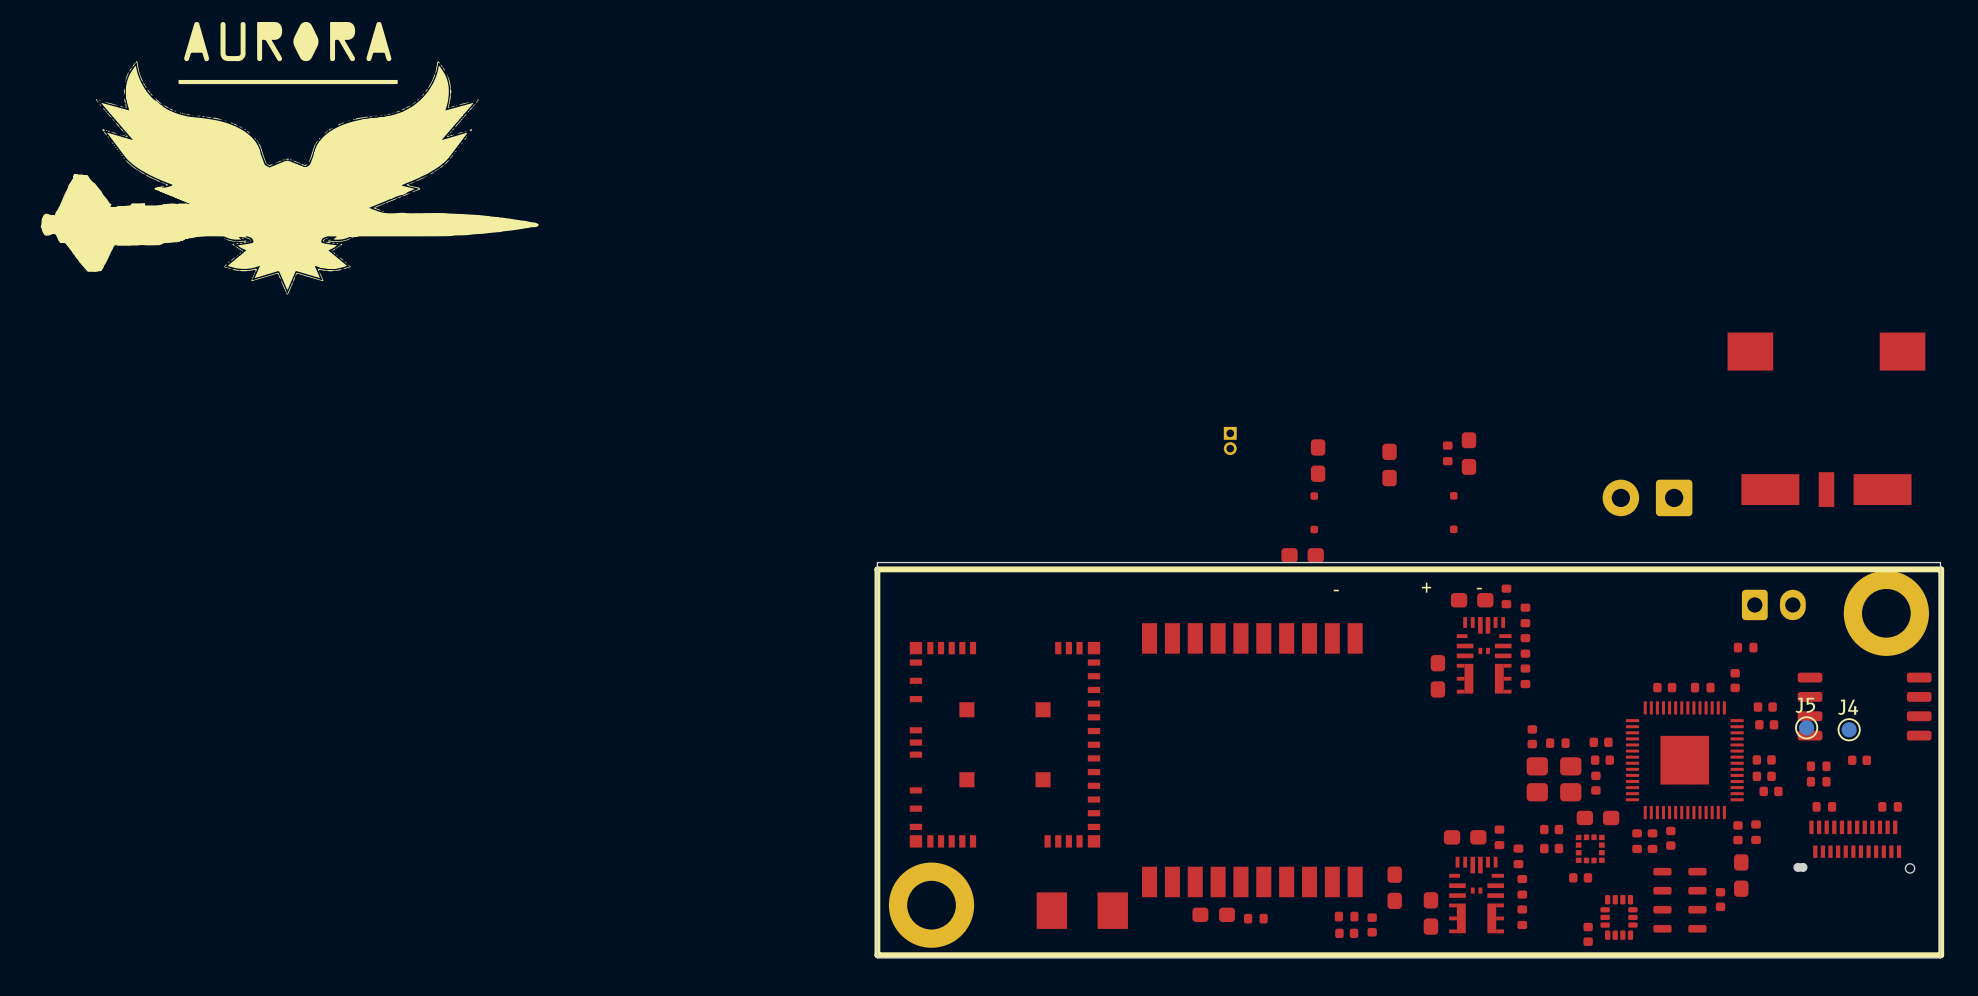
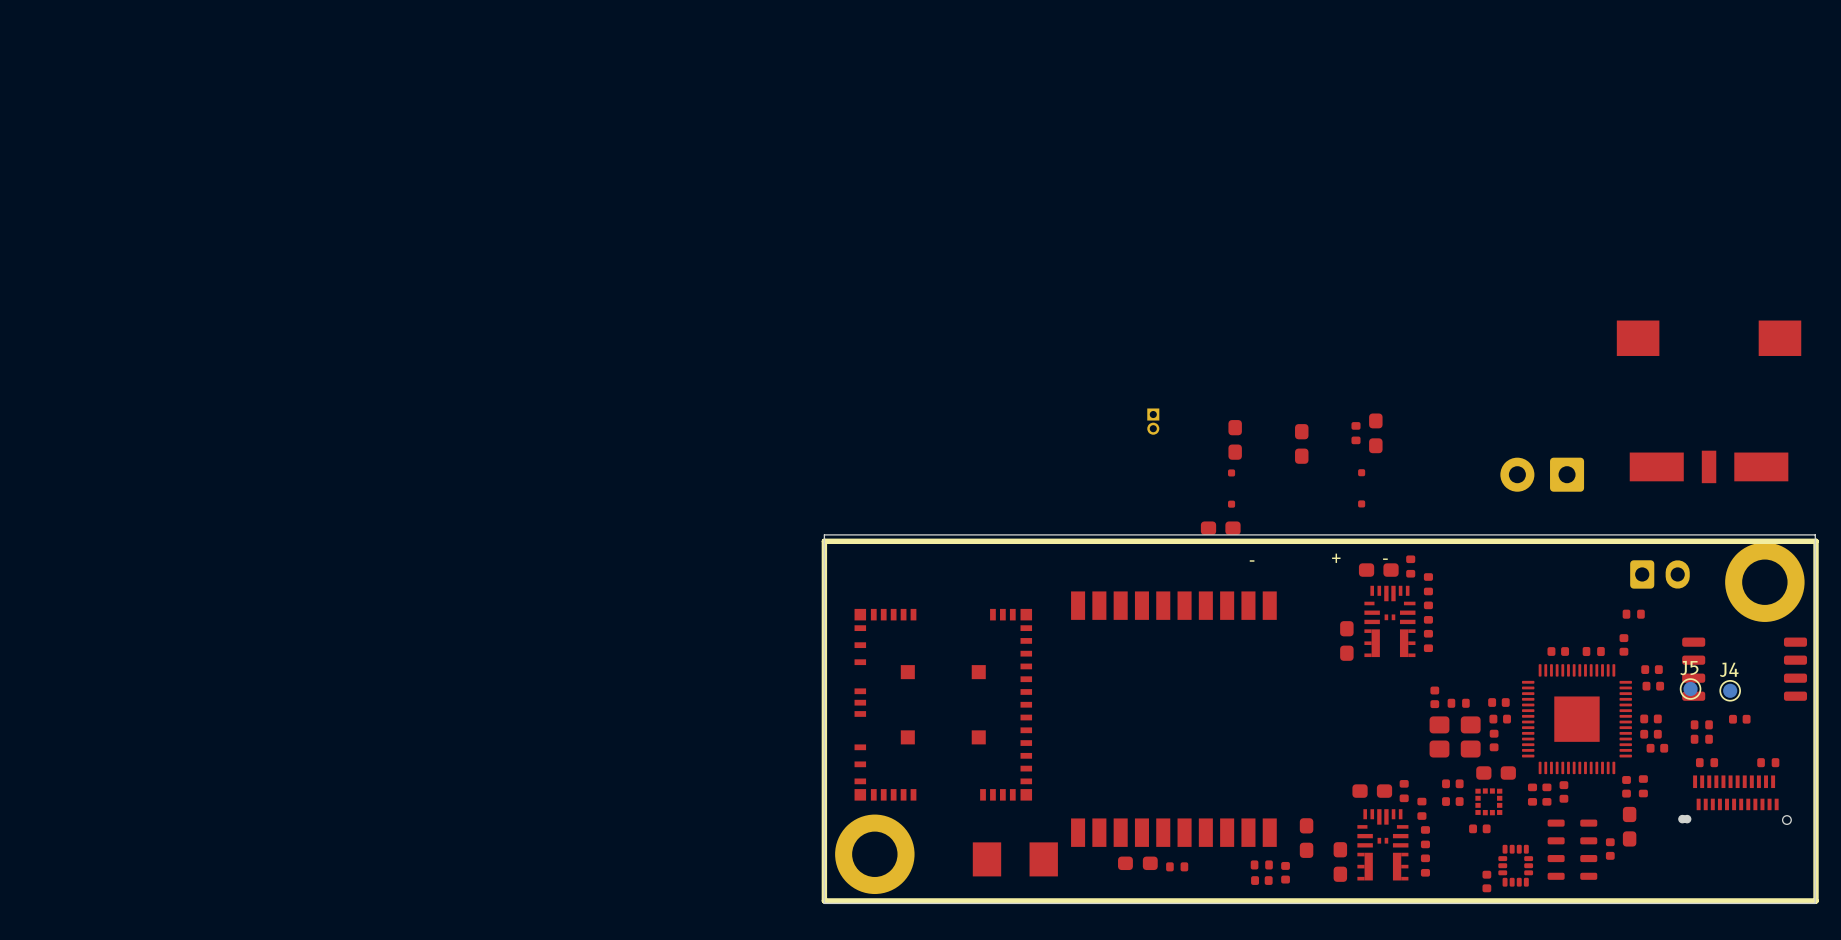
drawing: [184, 21, 392, 62] -> none
drawing: [40, 61, 539, 295] -> none

